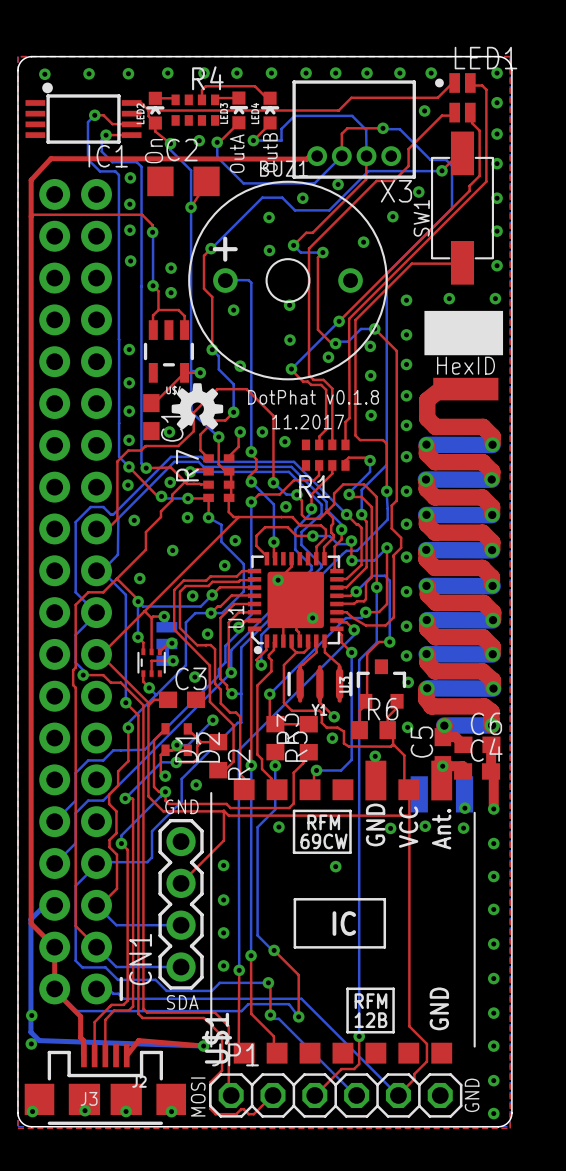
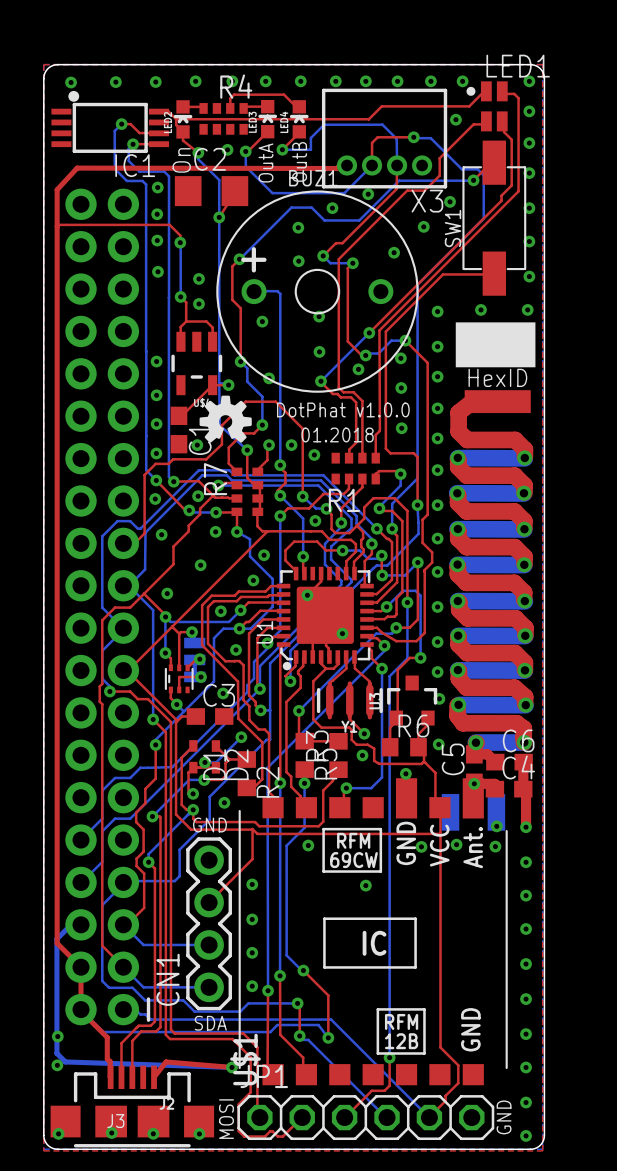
text: DotPhat v0.1.8 (313, 397) -> DotPhat v1.0.0 (343, 409)
text: 11.2017 (308, 422) -> 01.2018 (337, 434)

